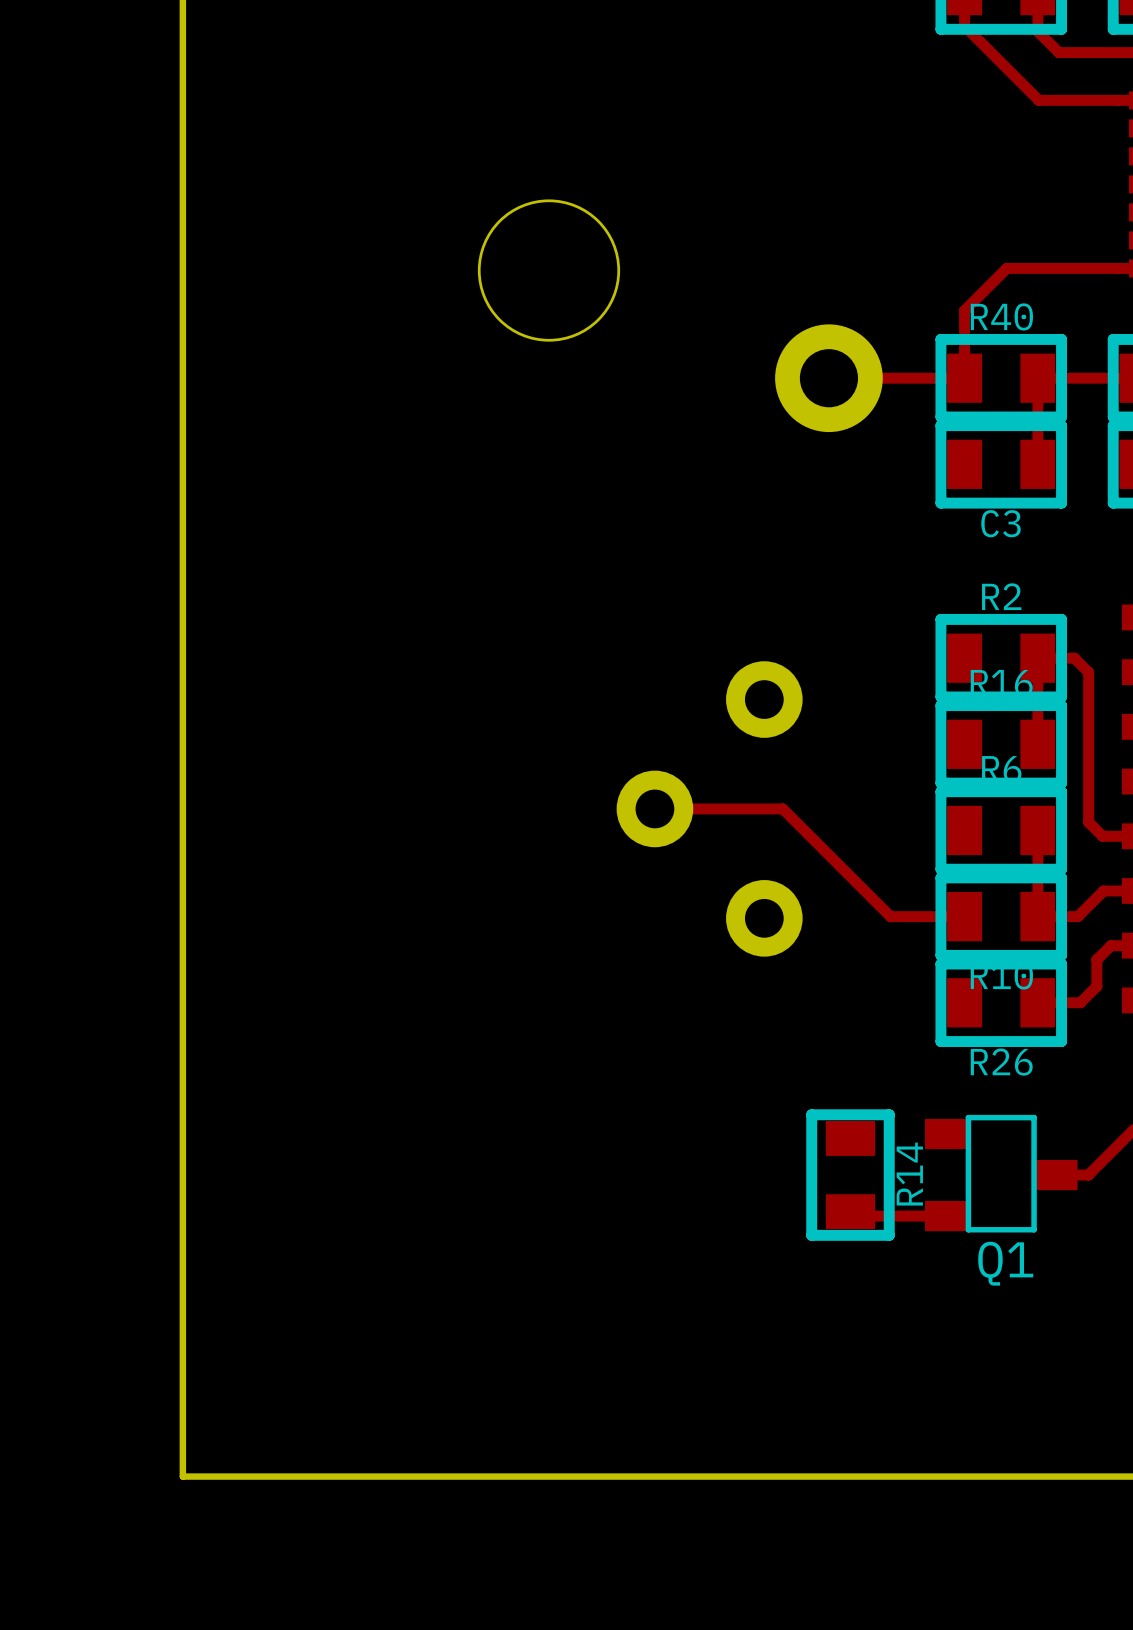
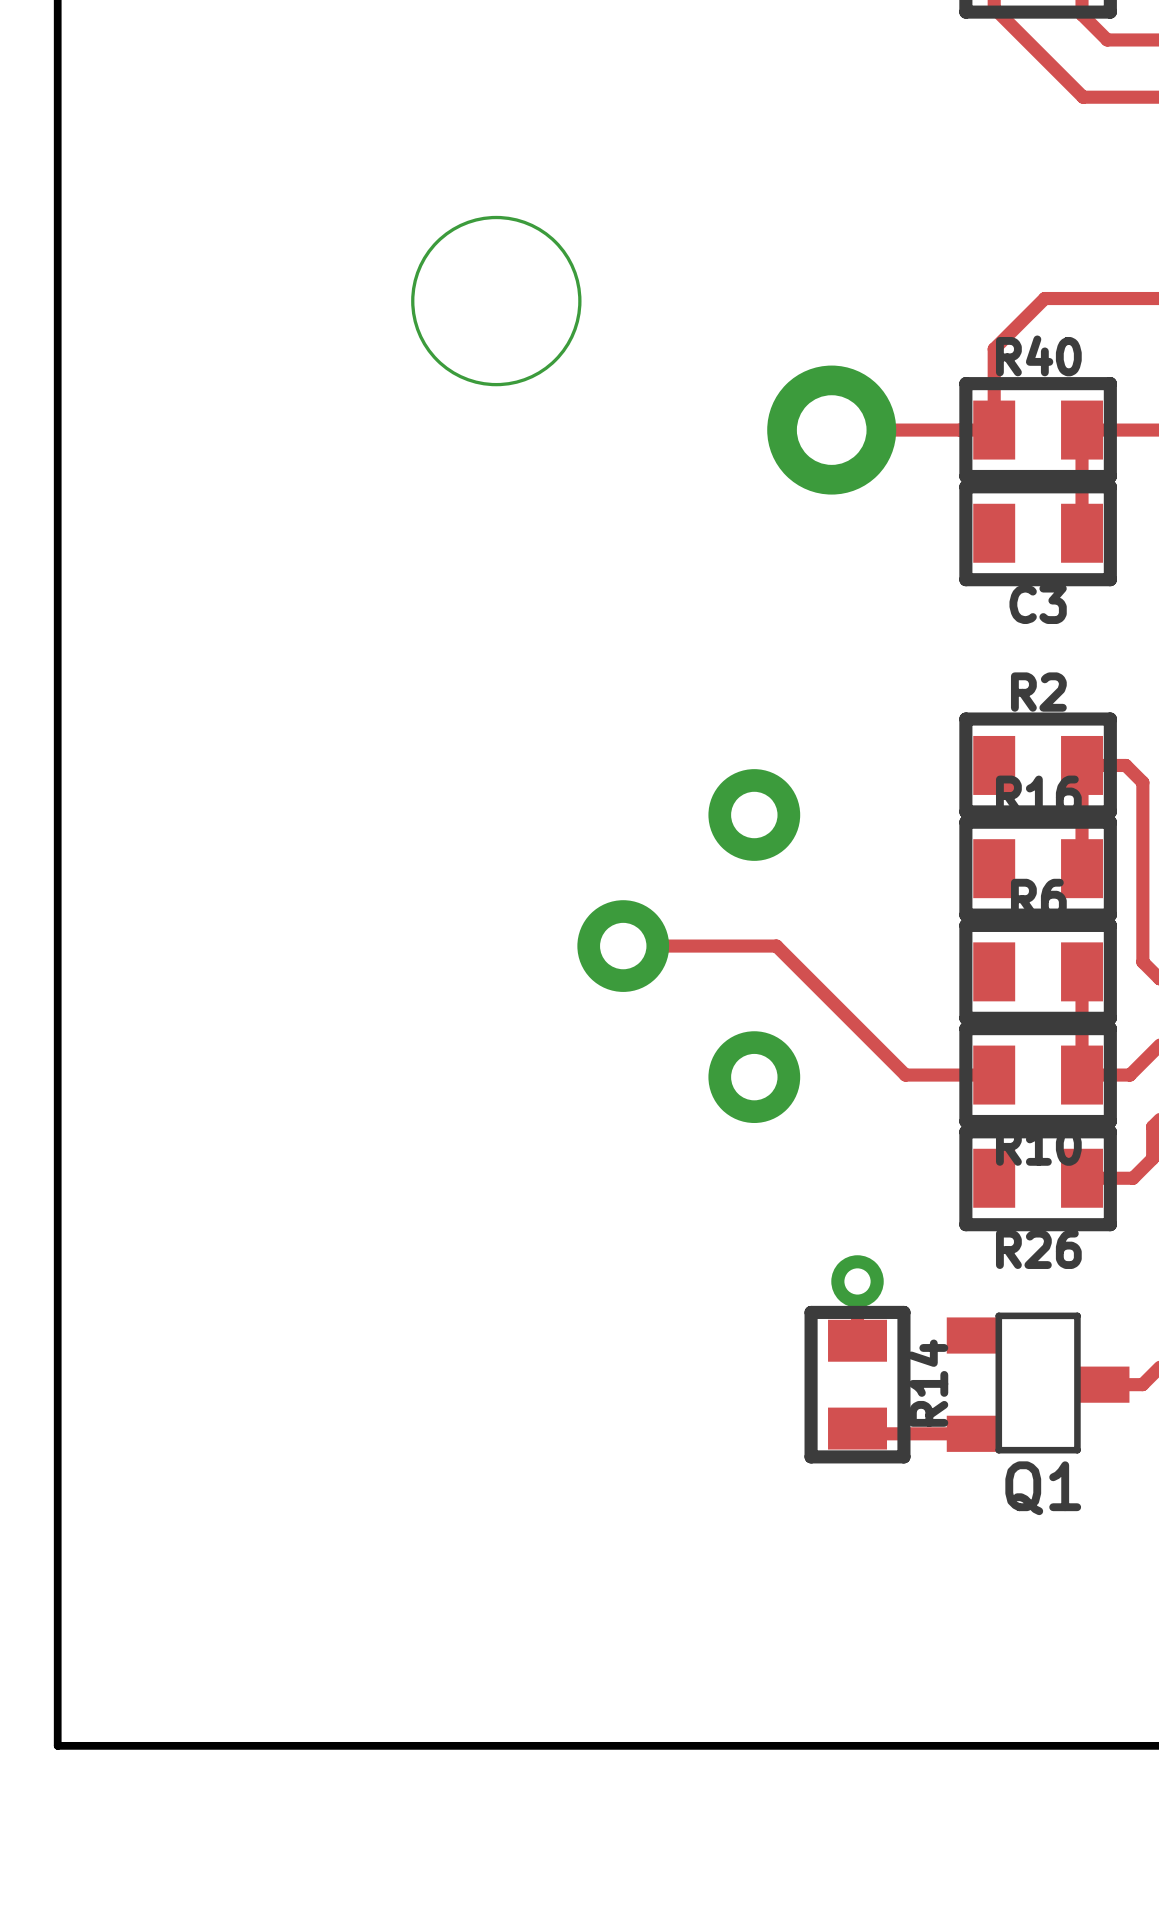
via: none -> (857, 1281)

